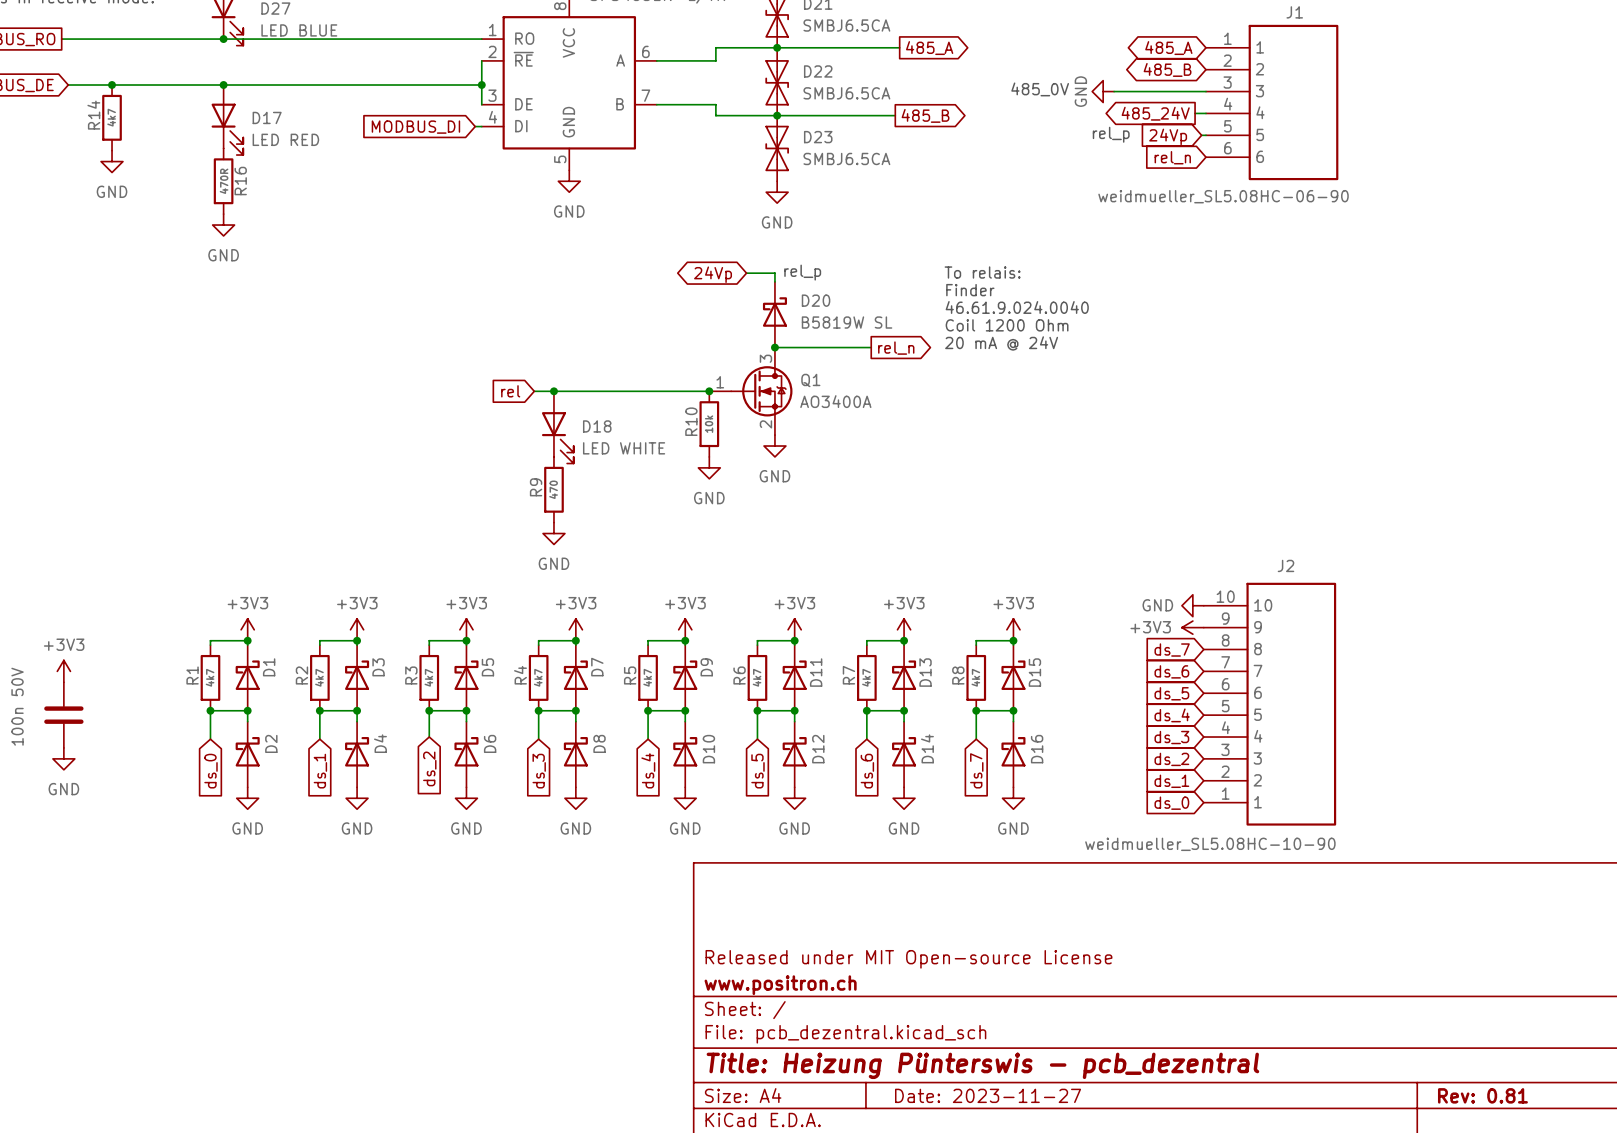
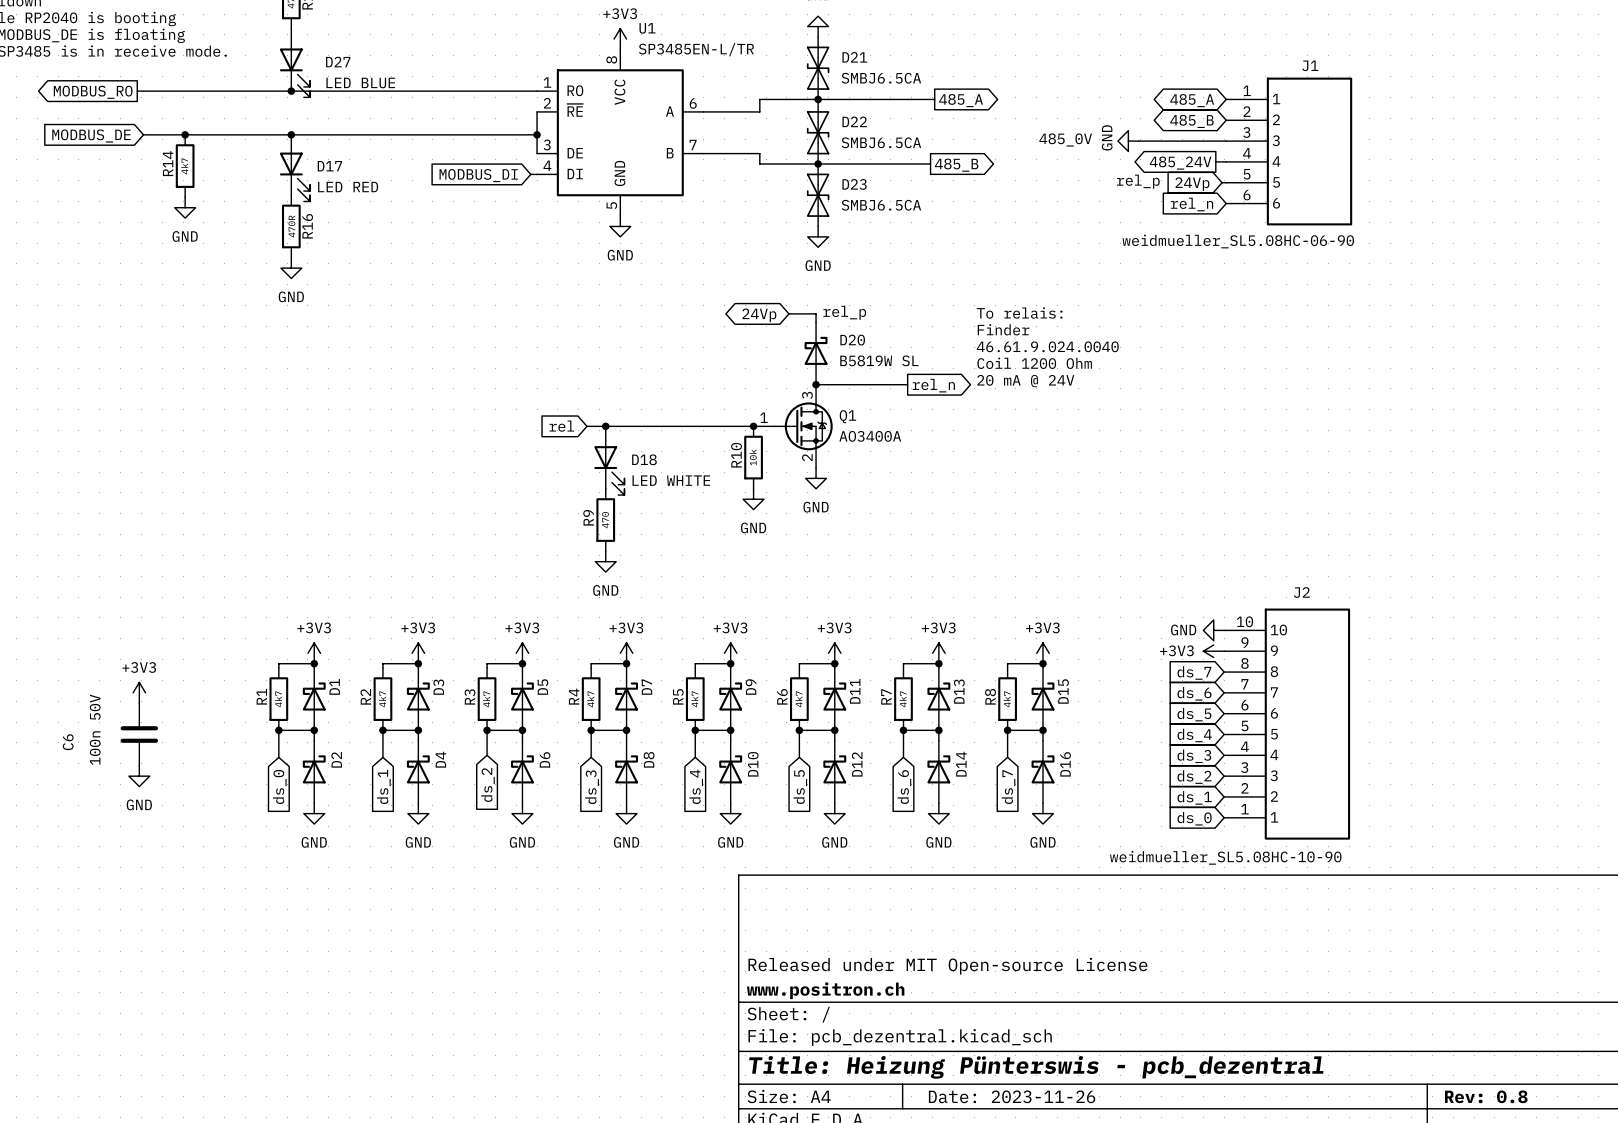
title block: Date: 2023-11-27 (988, 1095) -> Date: 2023-11-26 (1012, 1096)
title block: Rev: 0.81 (1482, 1095) -> Rev: 0.8 (1486, 1096)

